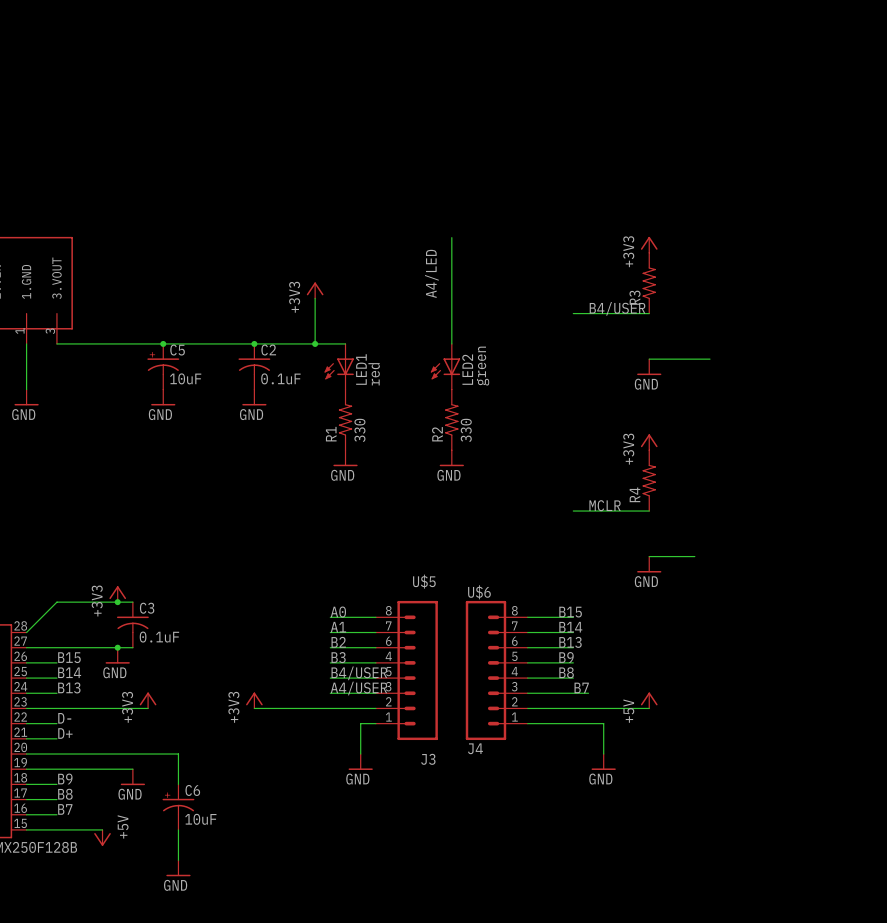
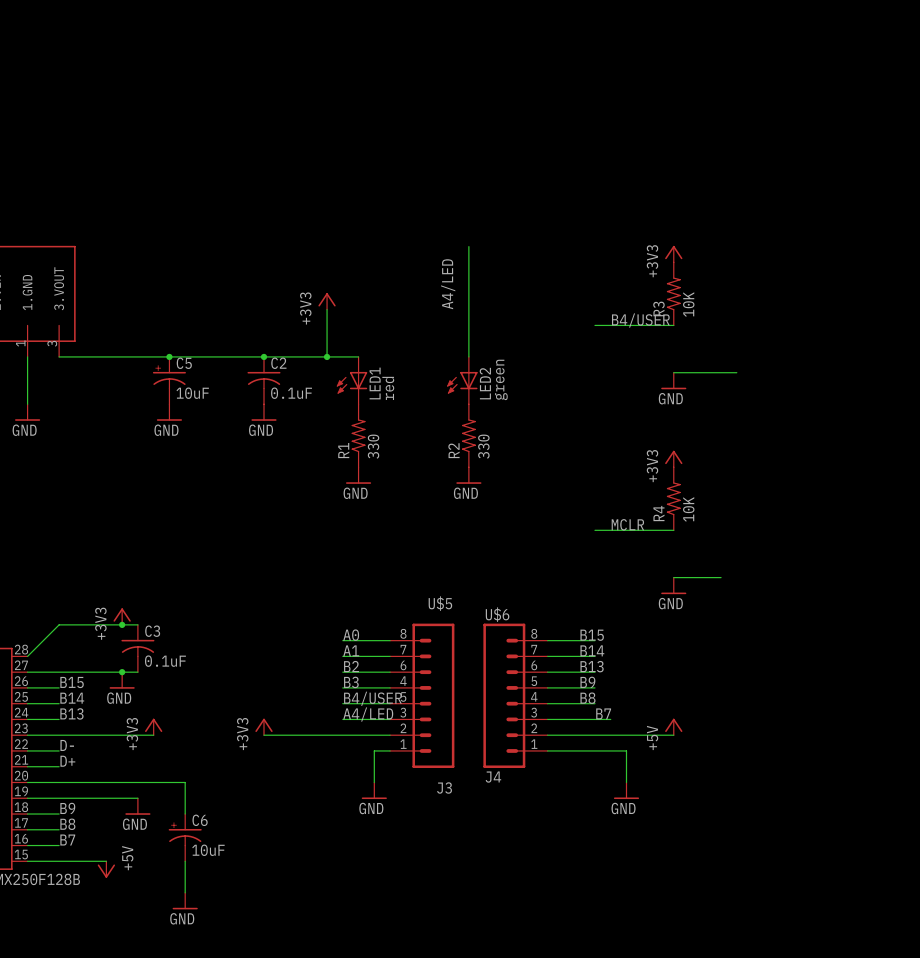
R3 value: none -> 10K (688, 304)
R4 value: none -> 10K (688, 509)
label: A4/USER (358, 688) -> A4/LED (368, 714)

